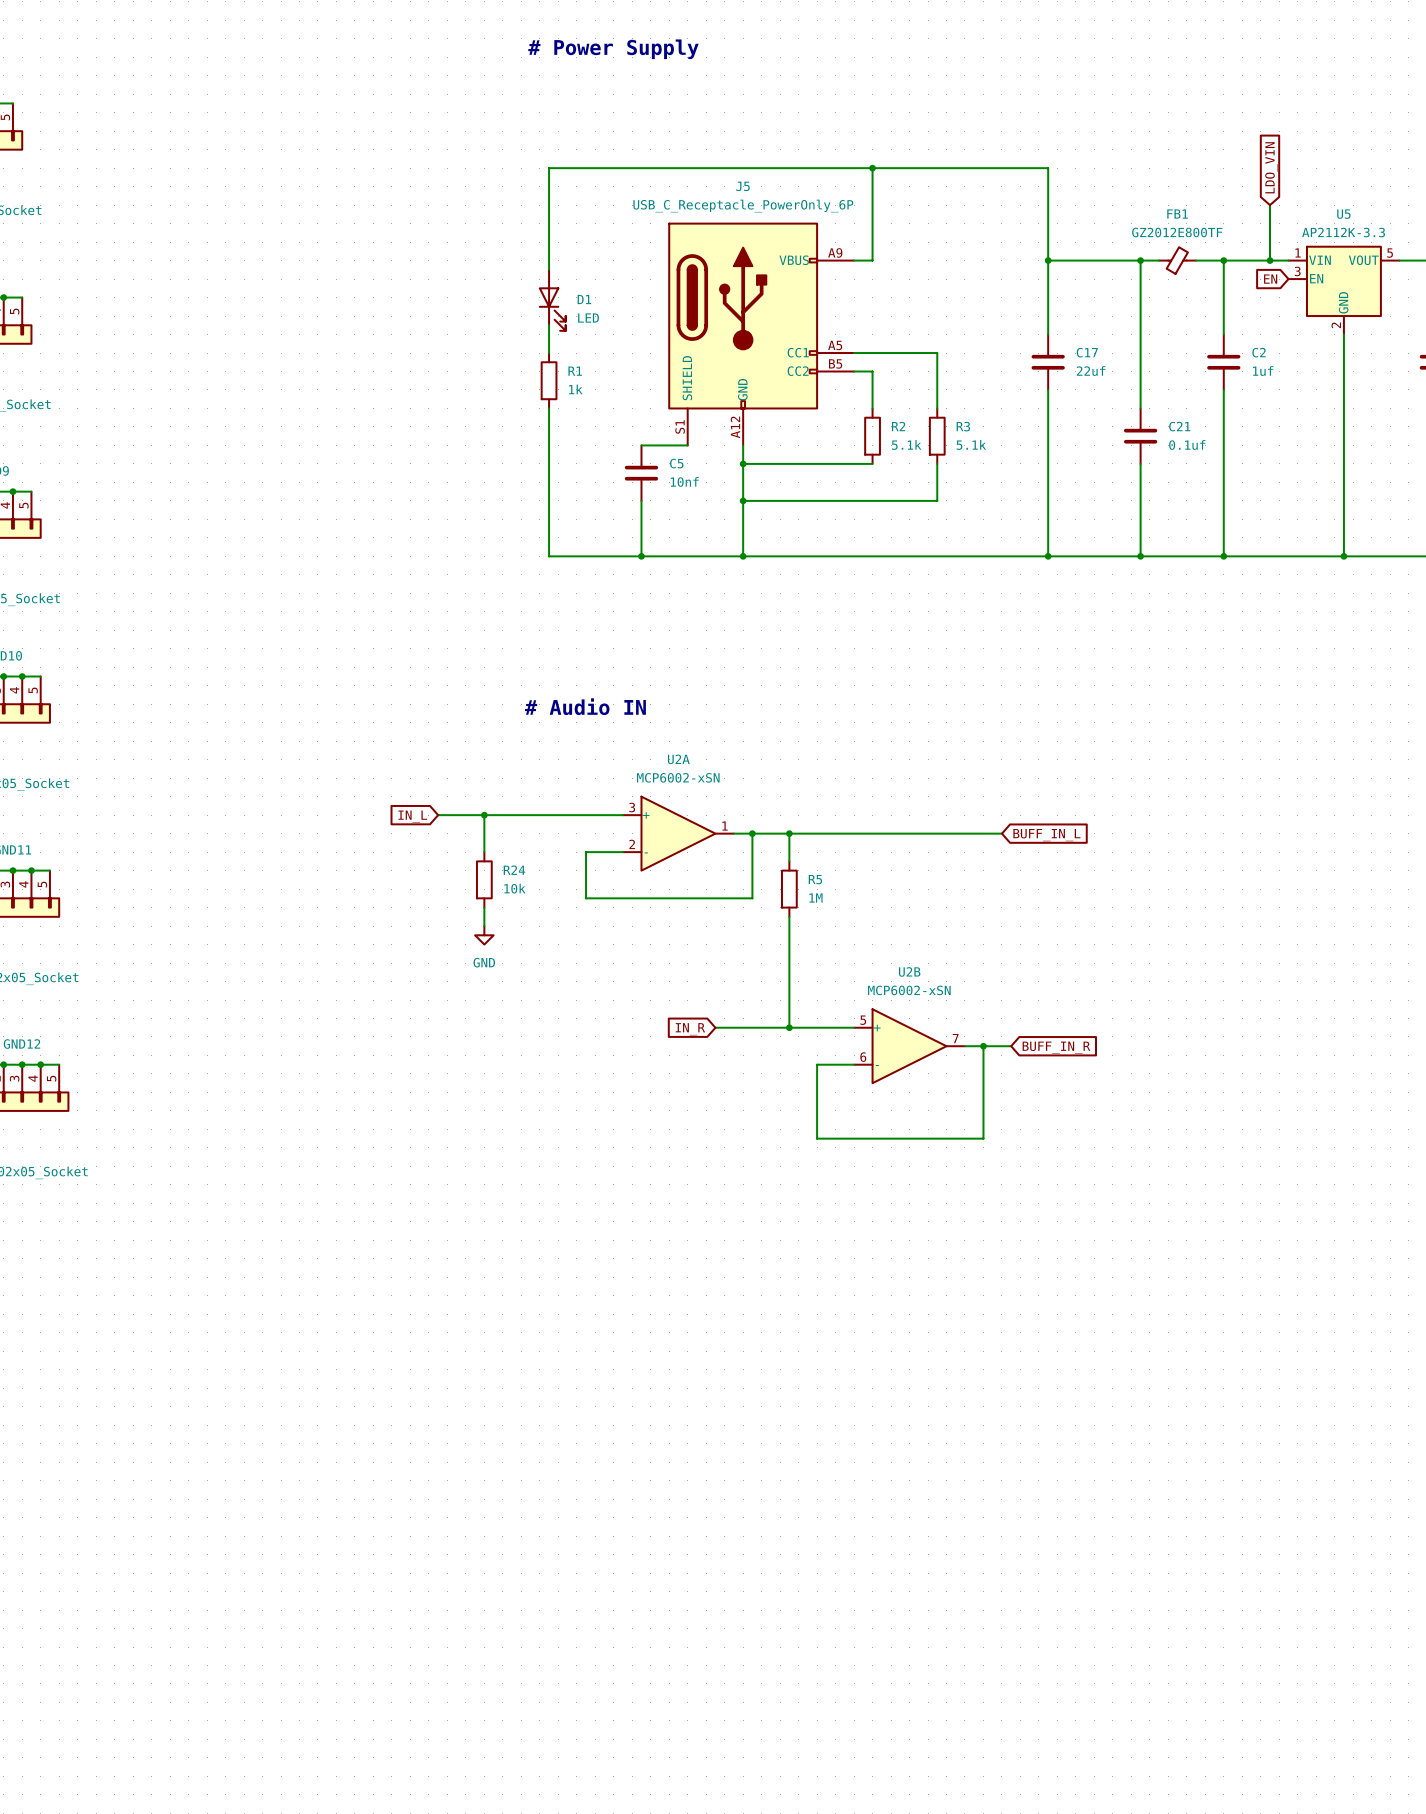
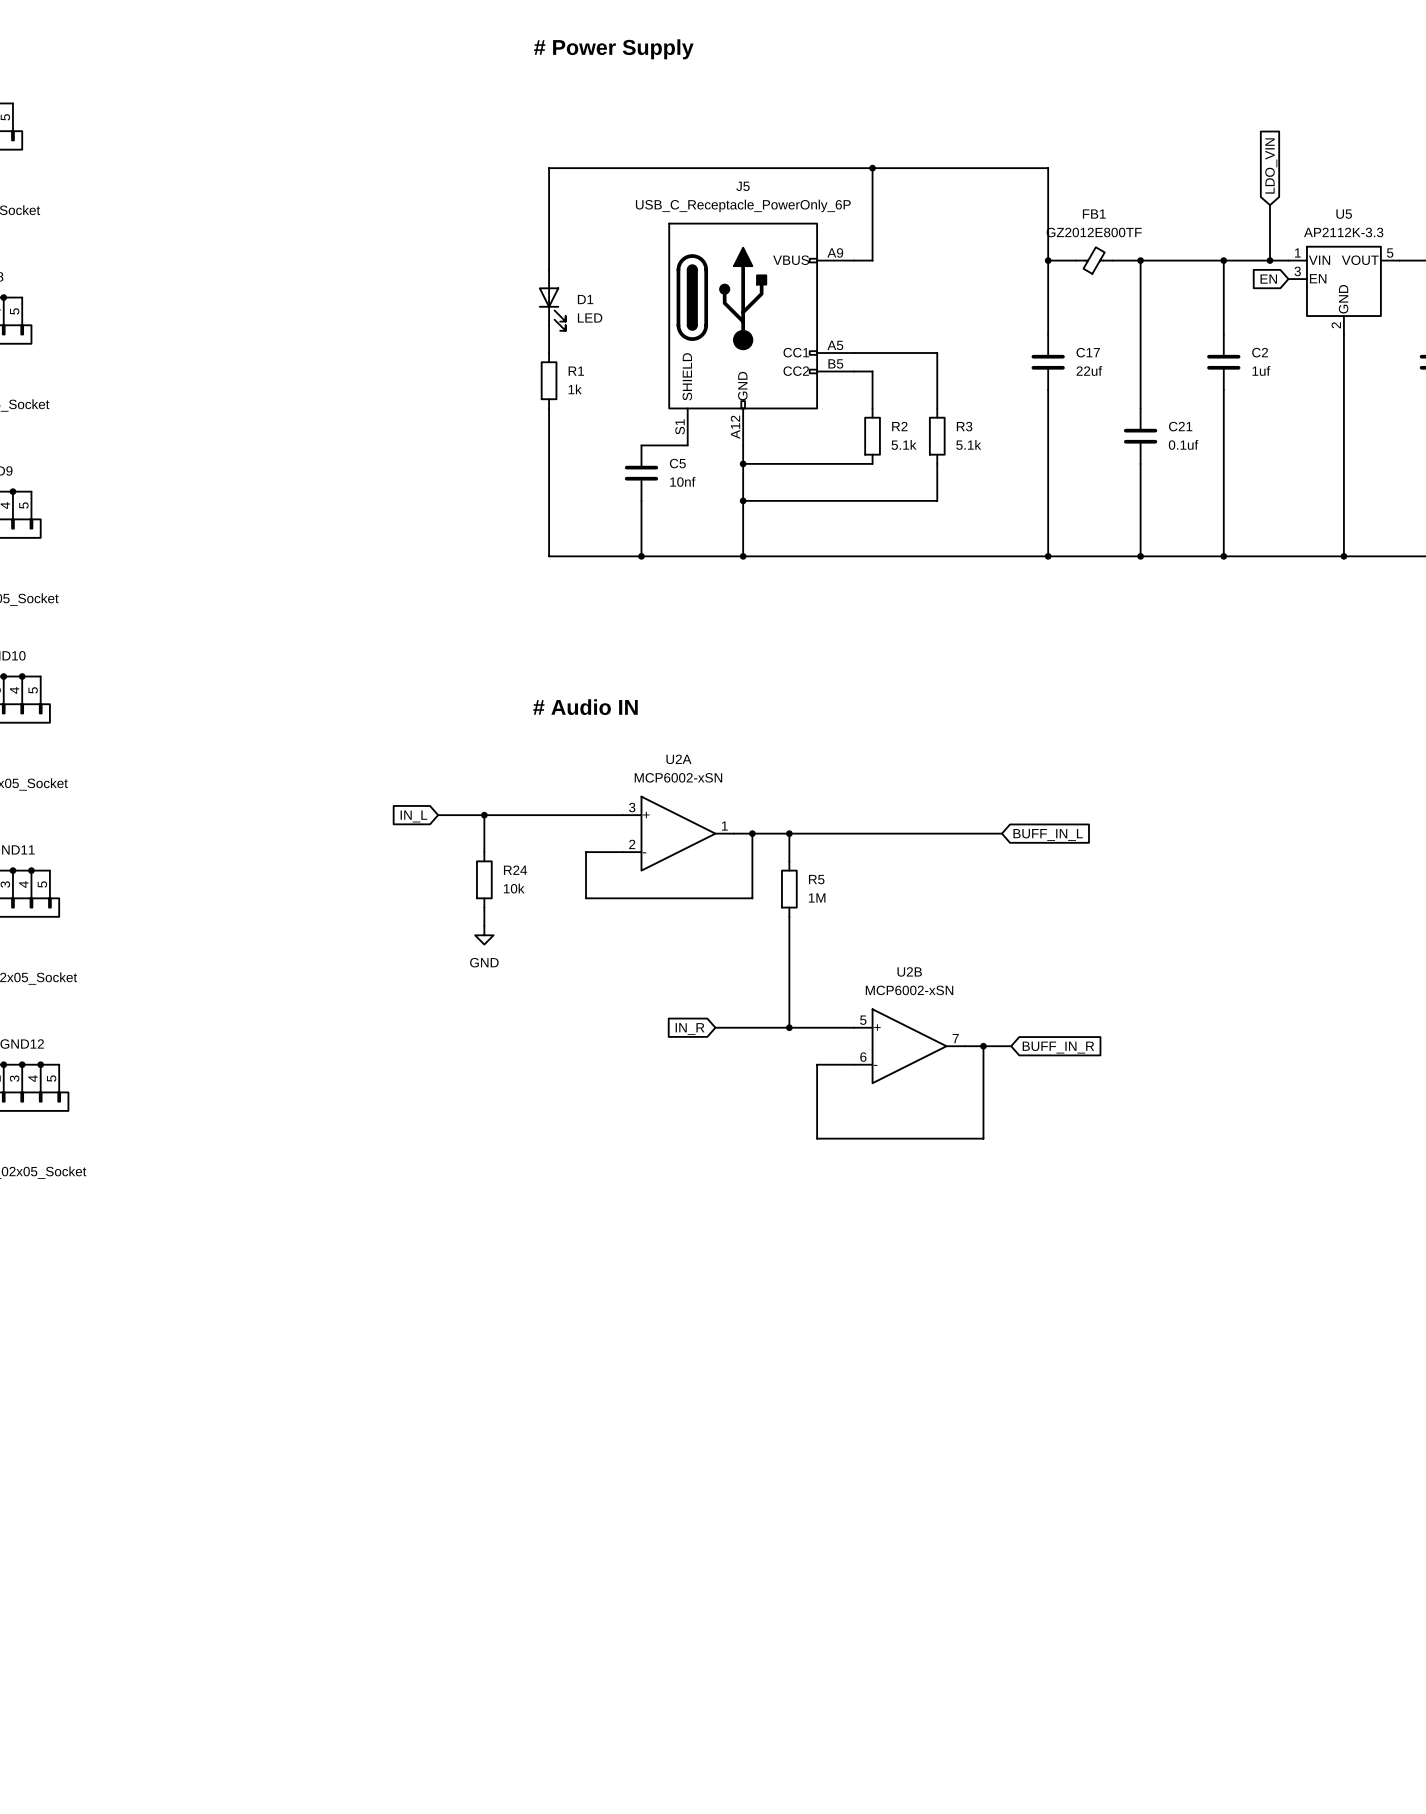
FB1 position: (1177, 260) -> (1094, 260)

